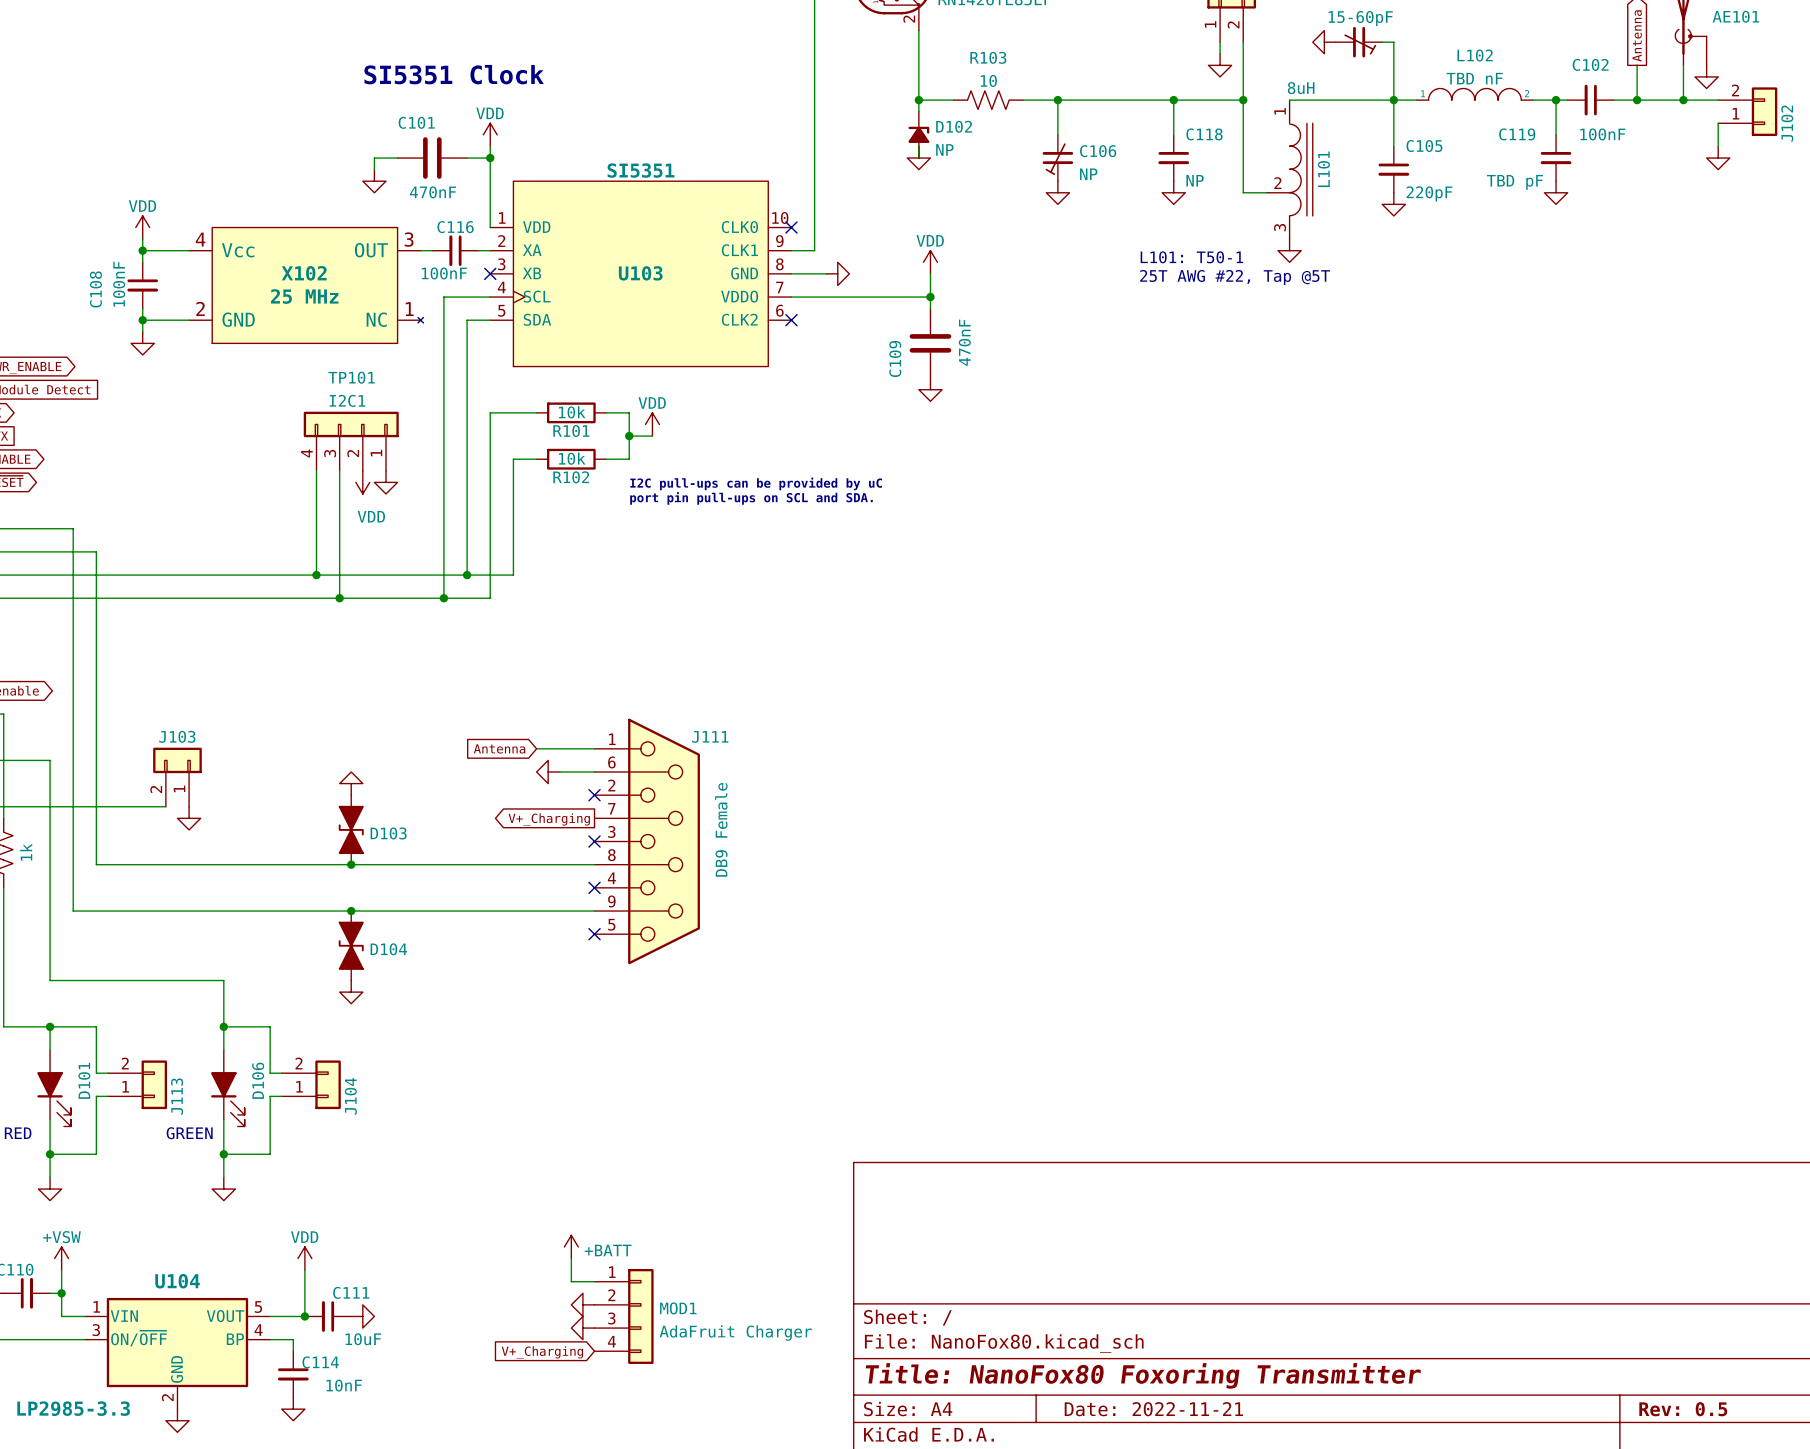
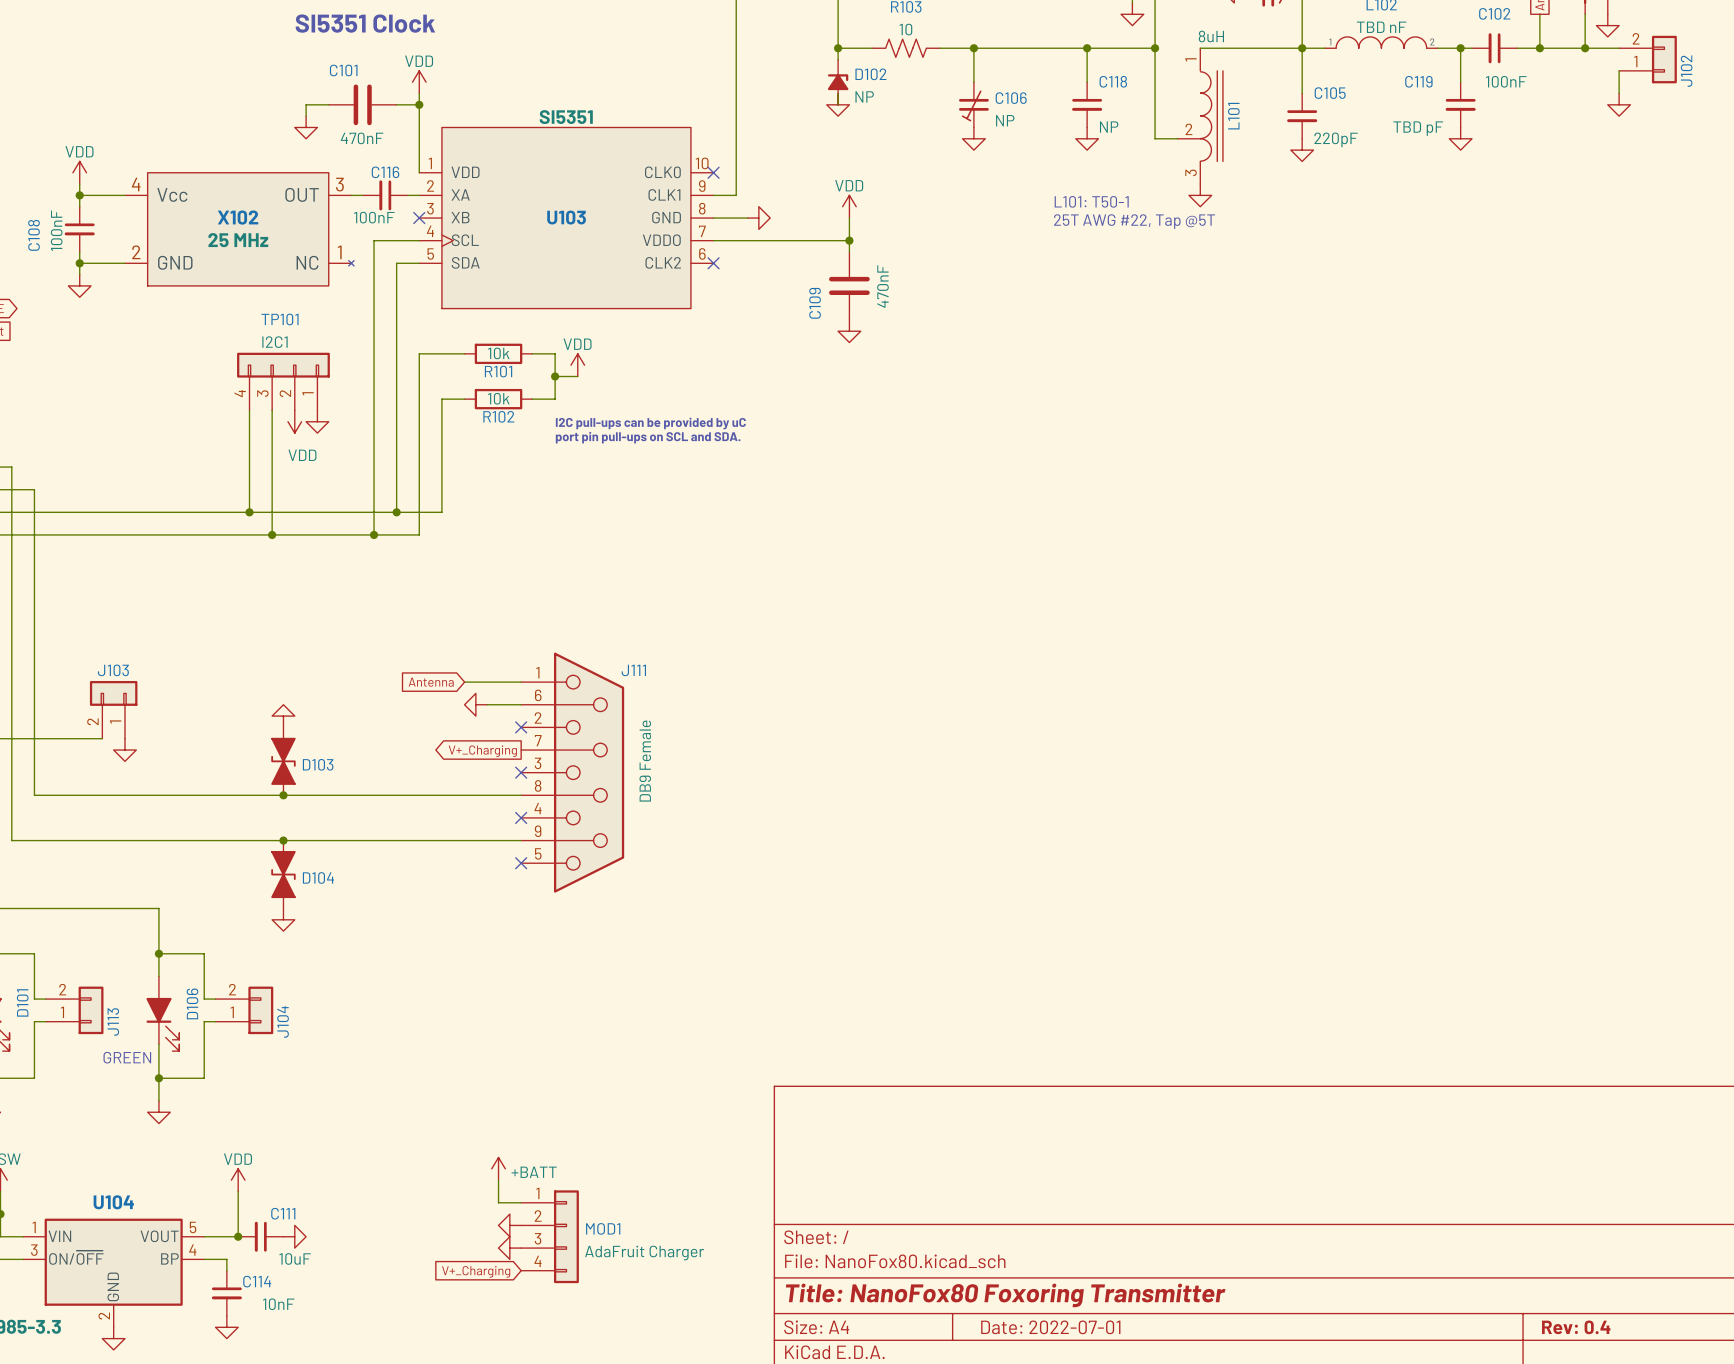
title block: Date: 2022-11-21 (1153, 1409) -> Date: 2022-07-01 (1050, 1327)
title block: Rev: 0.5 (1683, 1409) -> Rev: 0.4 (1576, 1327)

